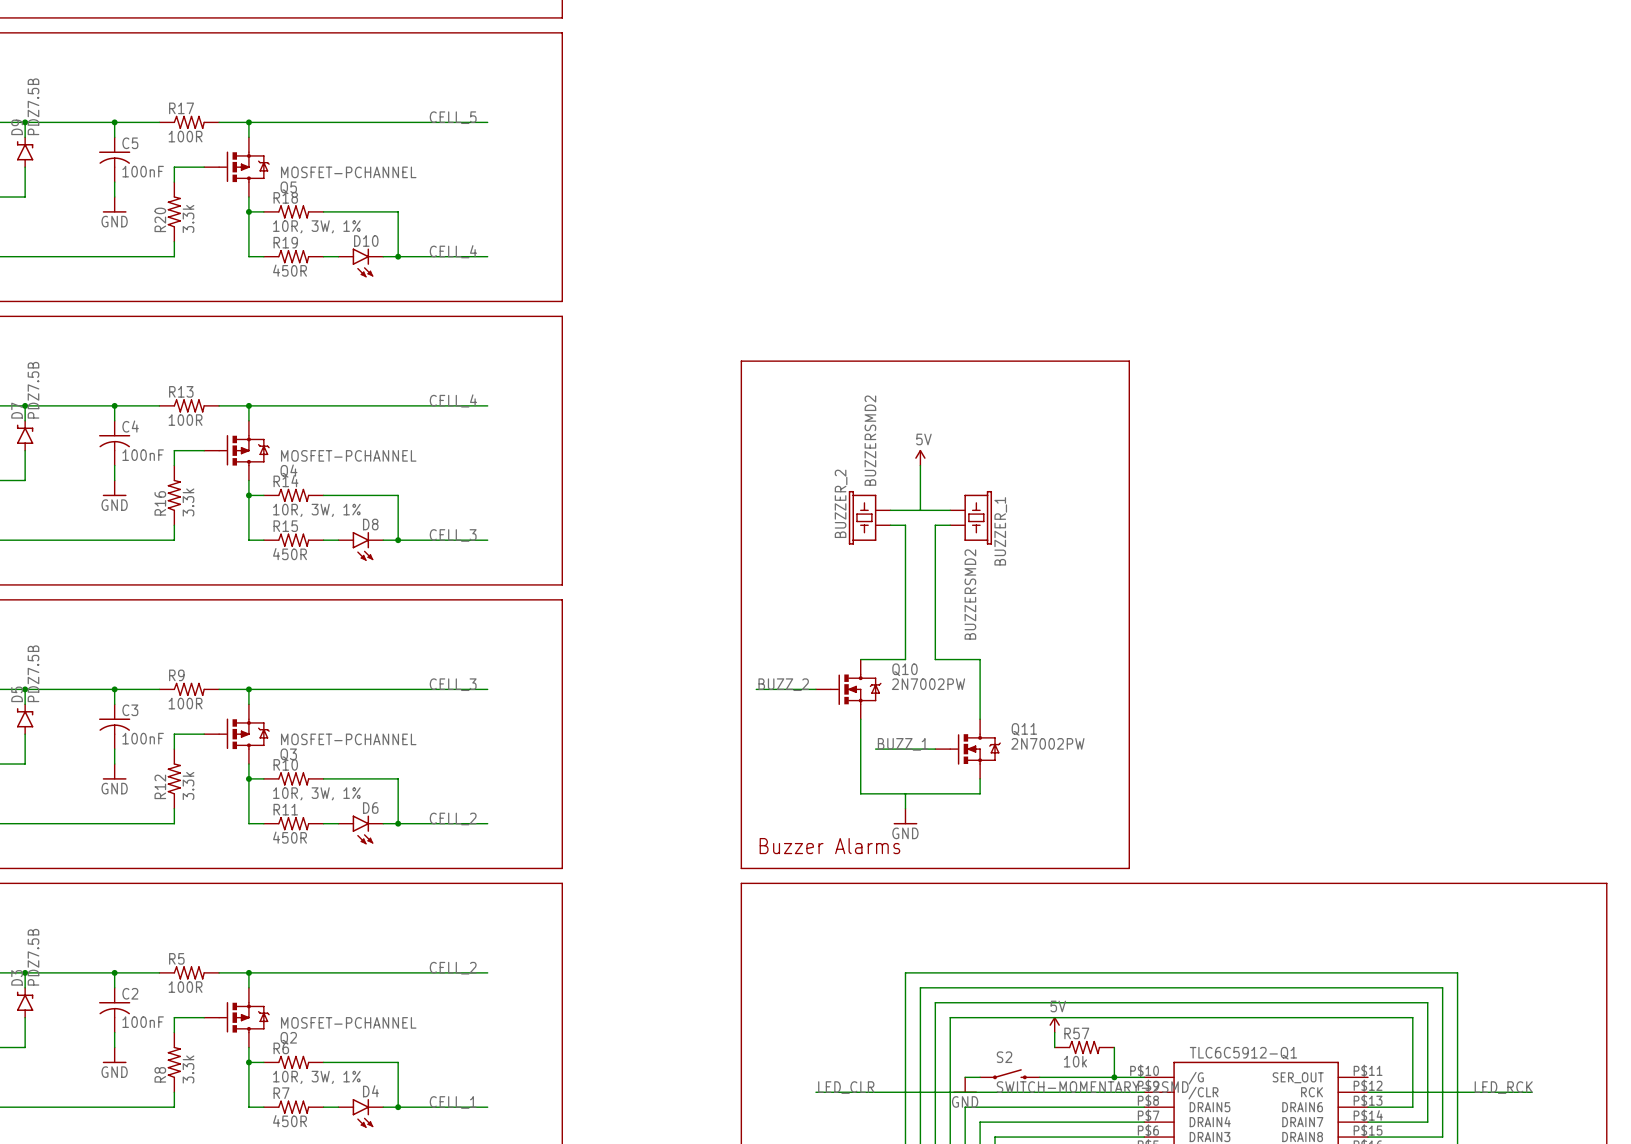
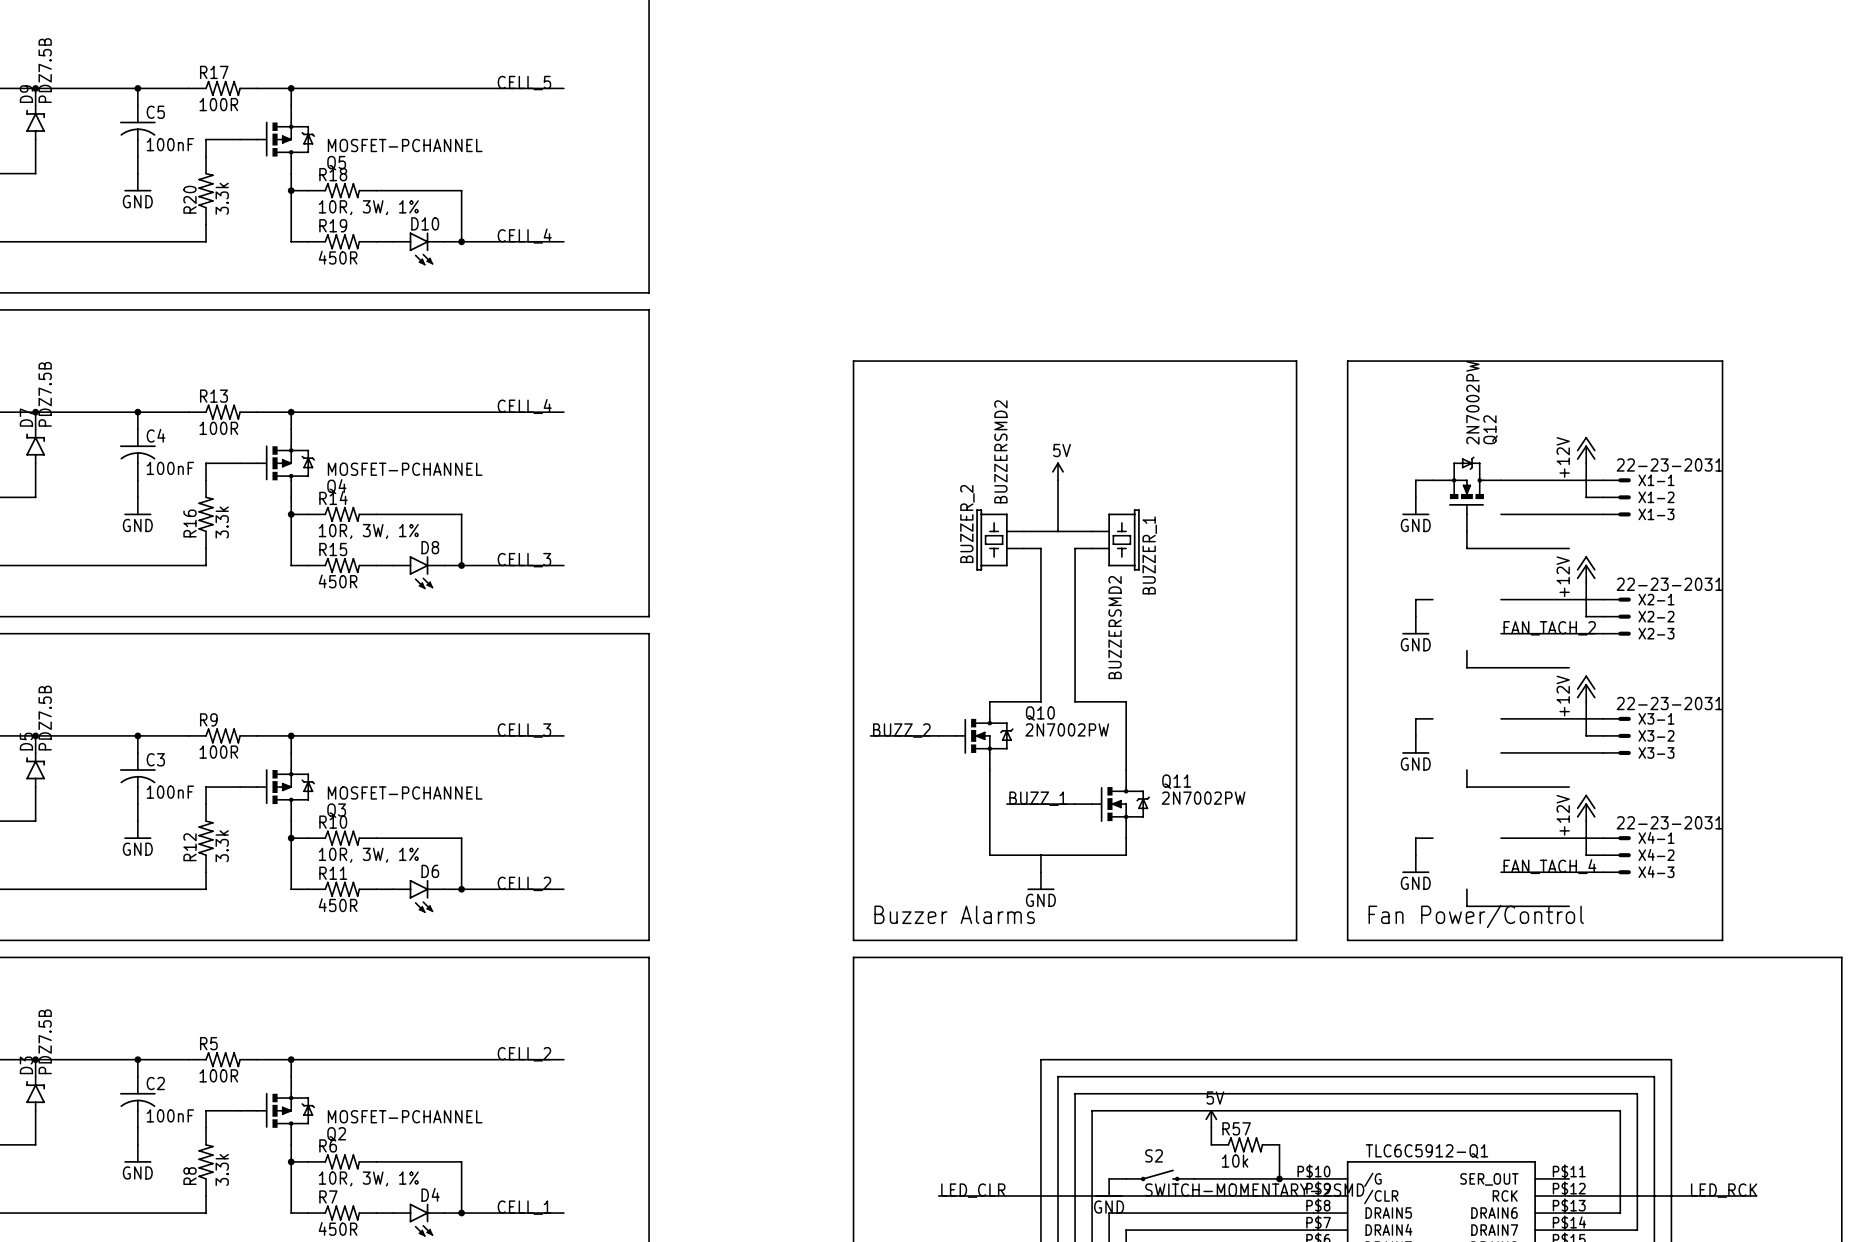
line: none -> (1347, 361) (1347, 940) (1722, 940) (1722, 361) (1347, 361)
power symbol: none -> +12V (1586, 450)
wire: none -> (1586, 463) (1586, 497) (1603, 497)
wire: none -> (1432, 480) (1415, 480) (1415, 497)
wire: none -> (1501, 480) (1603, 480)
X1-1: none -> 22-23-2031 (1617, 480)
Q12: none -> 2N7002PW (1466, 494)
X1-2: none -> (1617, 497)
power symbol: none -> GND (1415, 506)
wire: none -> (1501, 514) (1603, 514)
X1-3: none -> (1617, 514)
wire: none -> (1466, 531) (1466, 548) (1569, 548)
power symbol: none -> +12V (1586, 569)
wire: none -> (1586, 582) (1586, 616) (1603, 616)
wire: none -> (1432, 599) (1415, 599) (1415, 616)
wire: none -> (1501, 599) (1603, 599)
X2-1: none -> 22-23-2031 (1617, 599)
X2-2: none -> (1617, 616)
power symbol: none -> GND (1415, 625)
label: none -> FAN_TACH_2 (1549, 628)
wire: none -> (1501, 633) (1603, 633)
X2-3: none -> (1617, 633)
wire: none -> (1466, 650) (1466, 667) (1569, 667)
power symbol: none -> +12V (1586, 688)
wire: none -> (1586, 701) (1586, 735) (1603, 735)
wire: none -> (1432, 718) (1415, 718) (1415, 735)
wire: none -> (1501, 718) (1603, 718)
X3-1: none -> 22-23-2031 (1617, 718)
X3-2: none -> (1617, 735)
power symbol: none -> GND (1415, 744)
wire: none -> (1501, 752) (1603, 752)
X3-3: none -> (1617, 752)
wire: none -> (1466, 770) (1466, 787) (1569, 787)
power symbol: none -> +12V (1586, 807)
wire: none -> (1586, 821) (1586, 855) (1603, 855)
wire: none -> (1432, 838) (1415, 838) (1415, 855)
wire: none -> (1501, 838) (1603, 838)
X4-1: none -> 22-23-2031 (1617, 838)
X4-2: none -> (1617, 855)
power symbol: none -> GND (1415, 864)
label: none -> FAN_TACH_4 (1549, 866)
wire: none -> (1501, 872) (1603, 872)
X4-3: none -> (1617, 872)
wire: none -> (1466, 889) (1466, 906) (1569, 906)
text: none -> Fan Power/Control (1476, 916)

